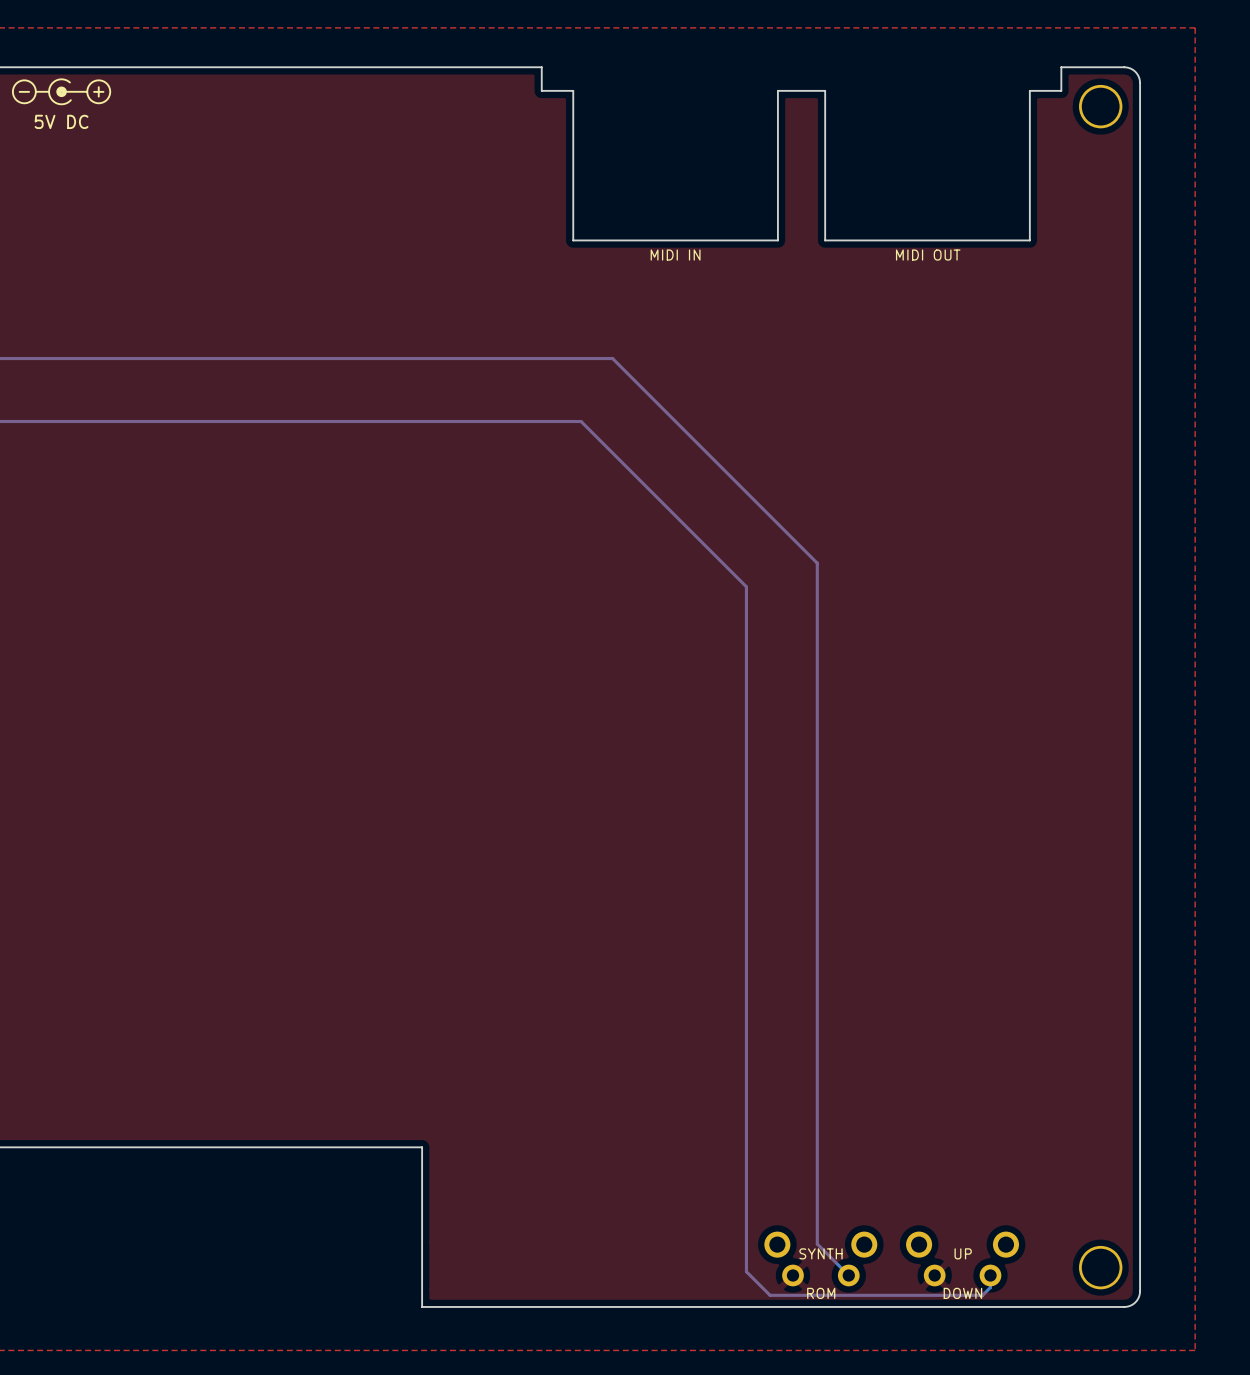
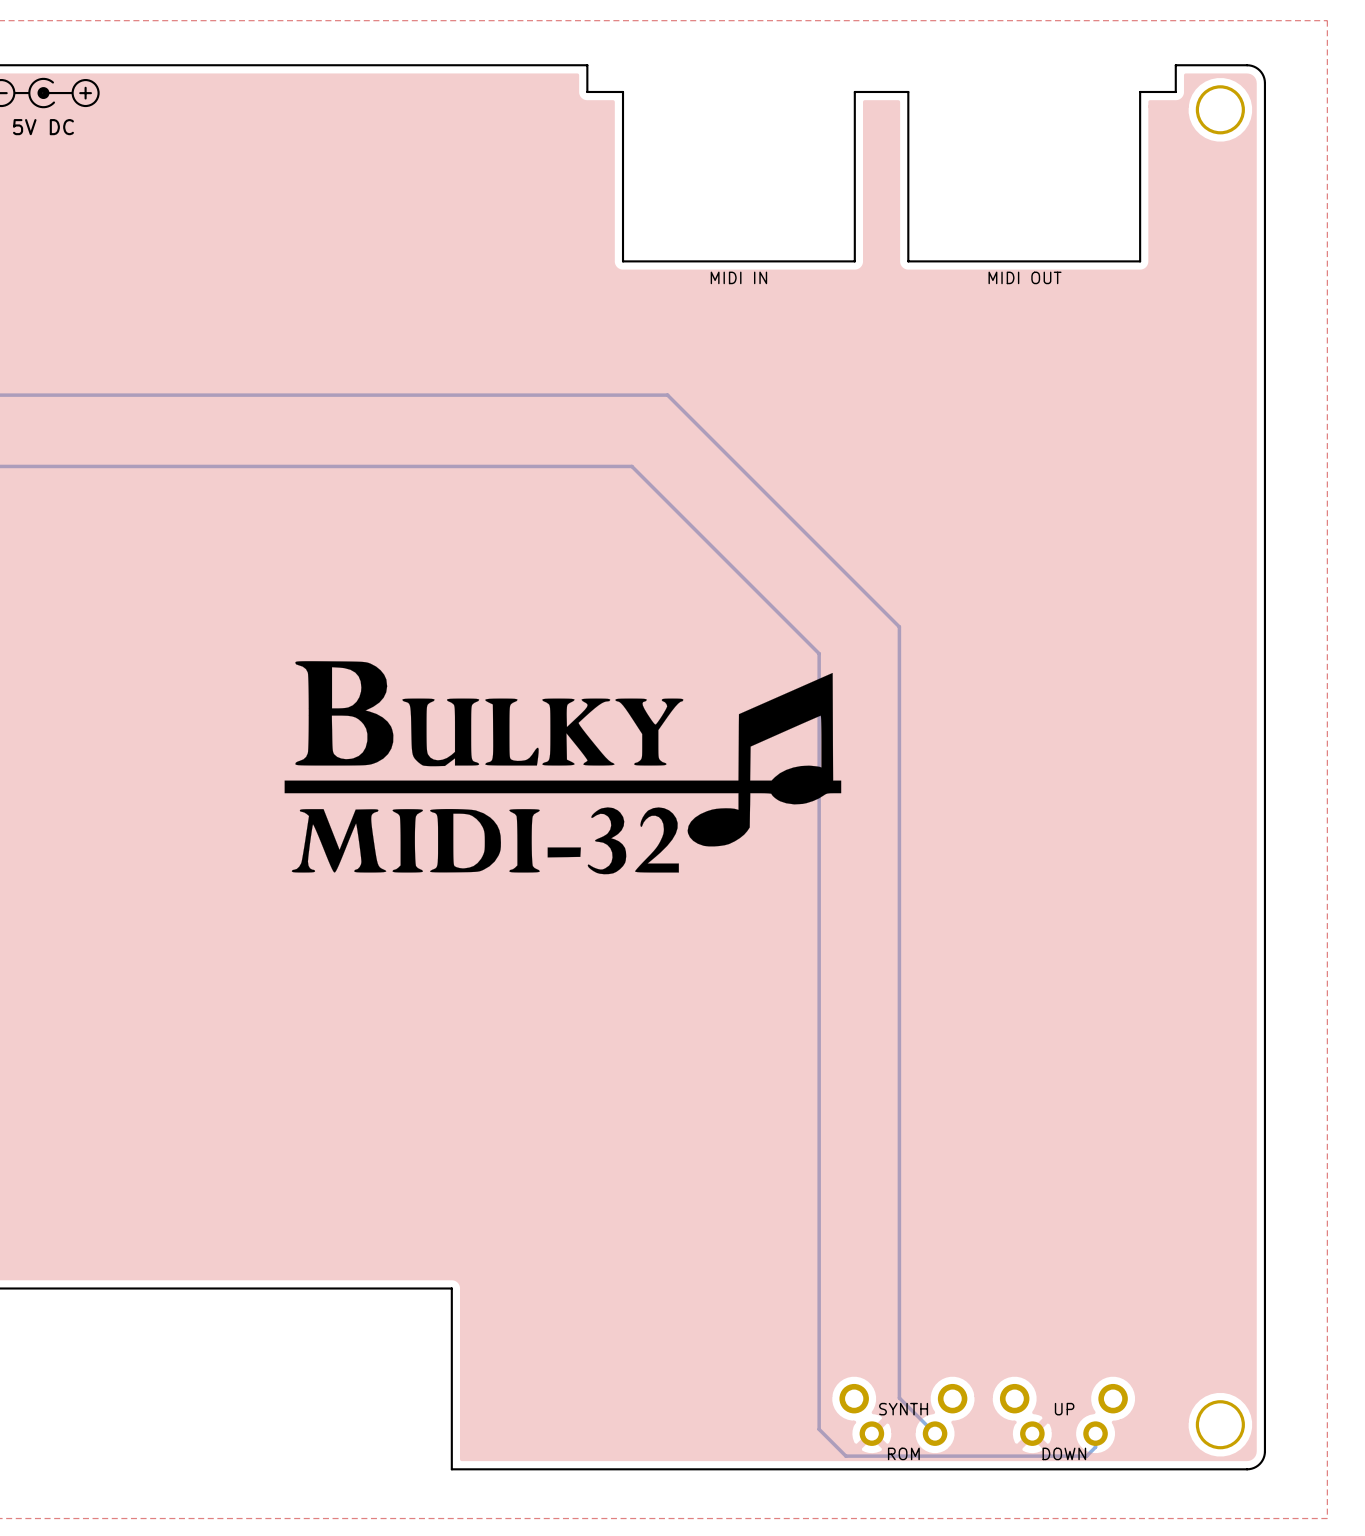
drawing: none -> [284, 661, 842, 875]

